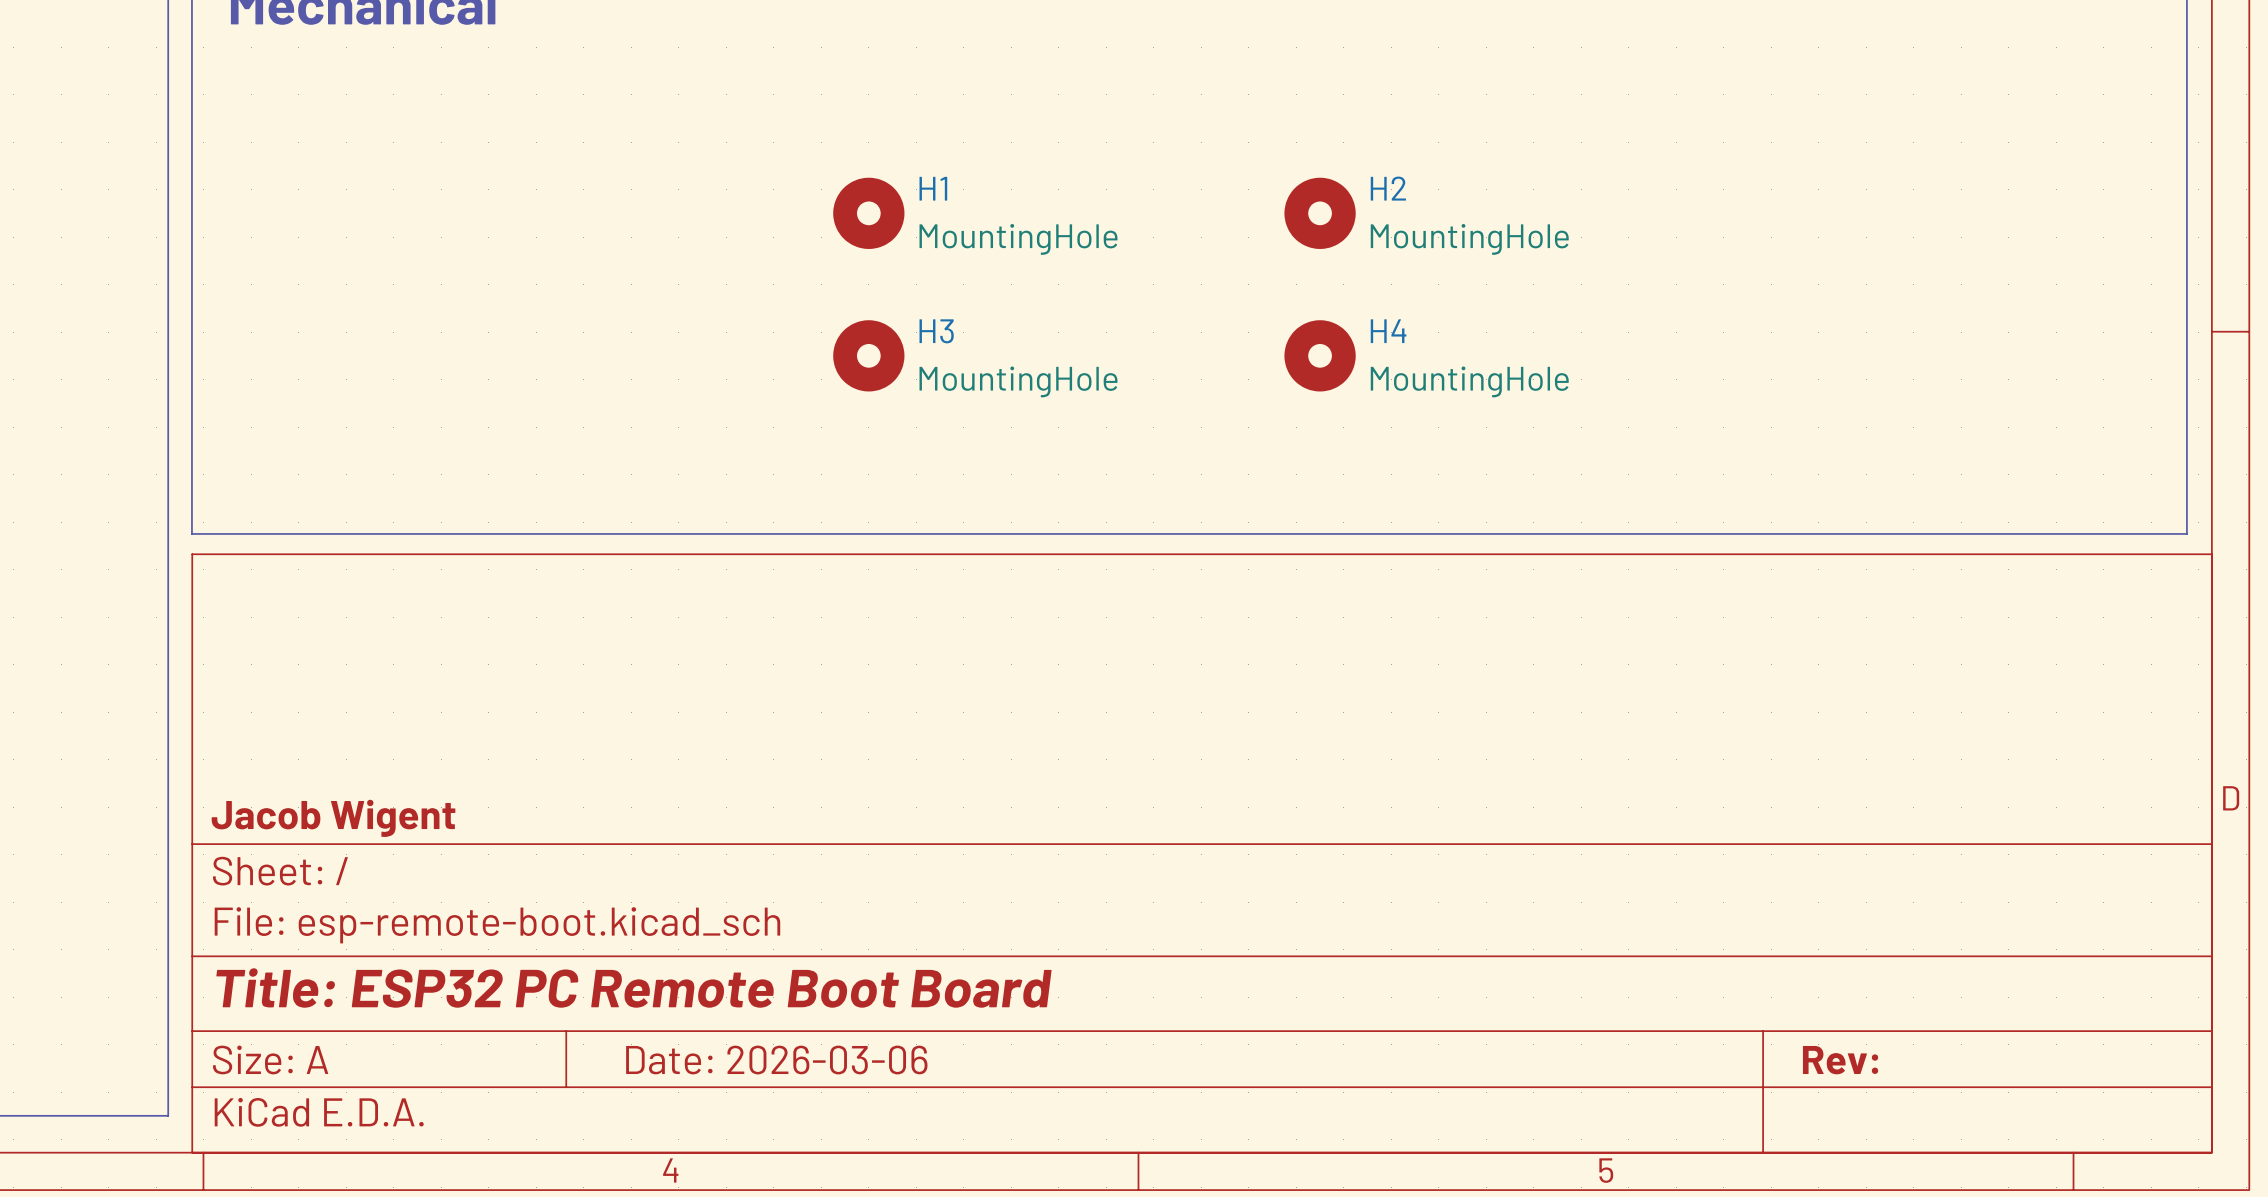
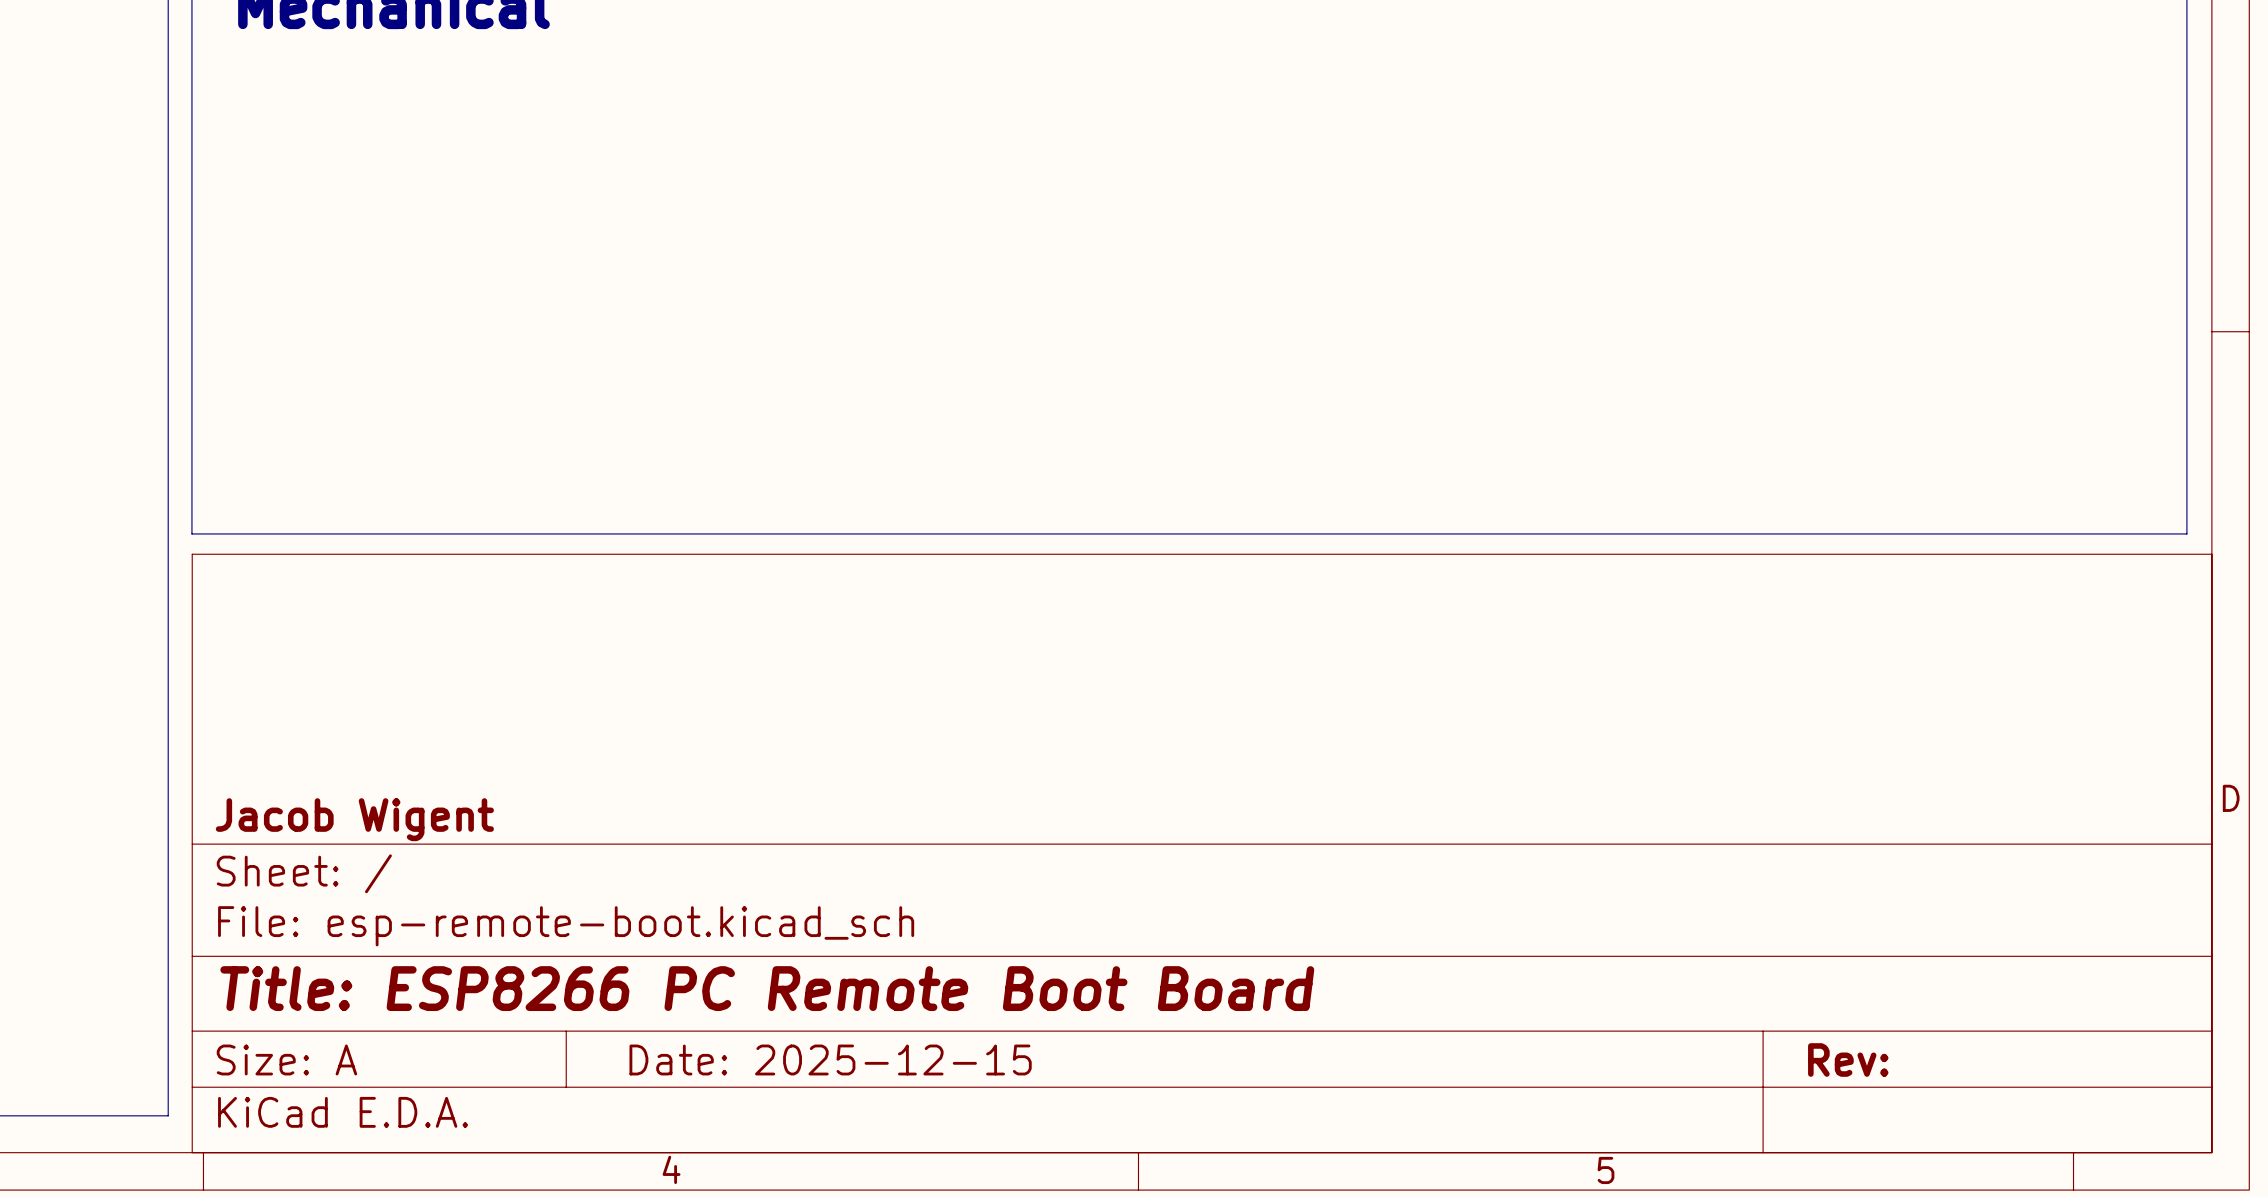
H1: MountingHole (868, 213) -> none
H2: MountingHole (1320, 213) -> none
H3: MountingHole (868, 355) -> none
H4: MountingHole (1320, 355) -> none
title block: Title: ESP32 PC Remote Boot Board (633, 987) -> Title: ESP8266 PC Remote Boot Board (767, 988)
title block: Date: 2026-03-06 (776, 1060) -> Date: 2025-12-15 (830, 1059)

